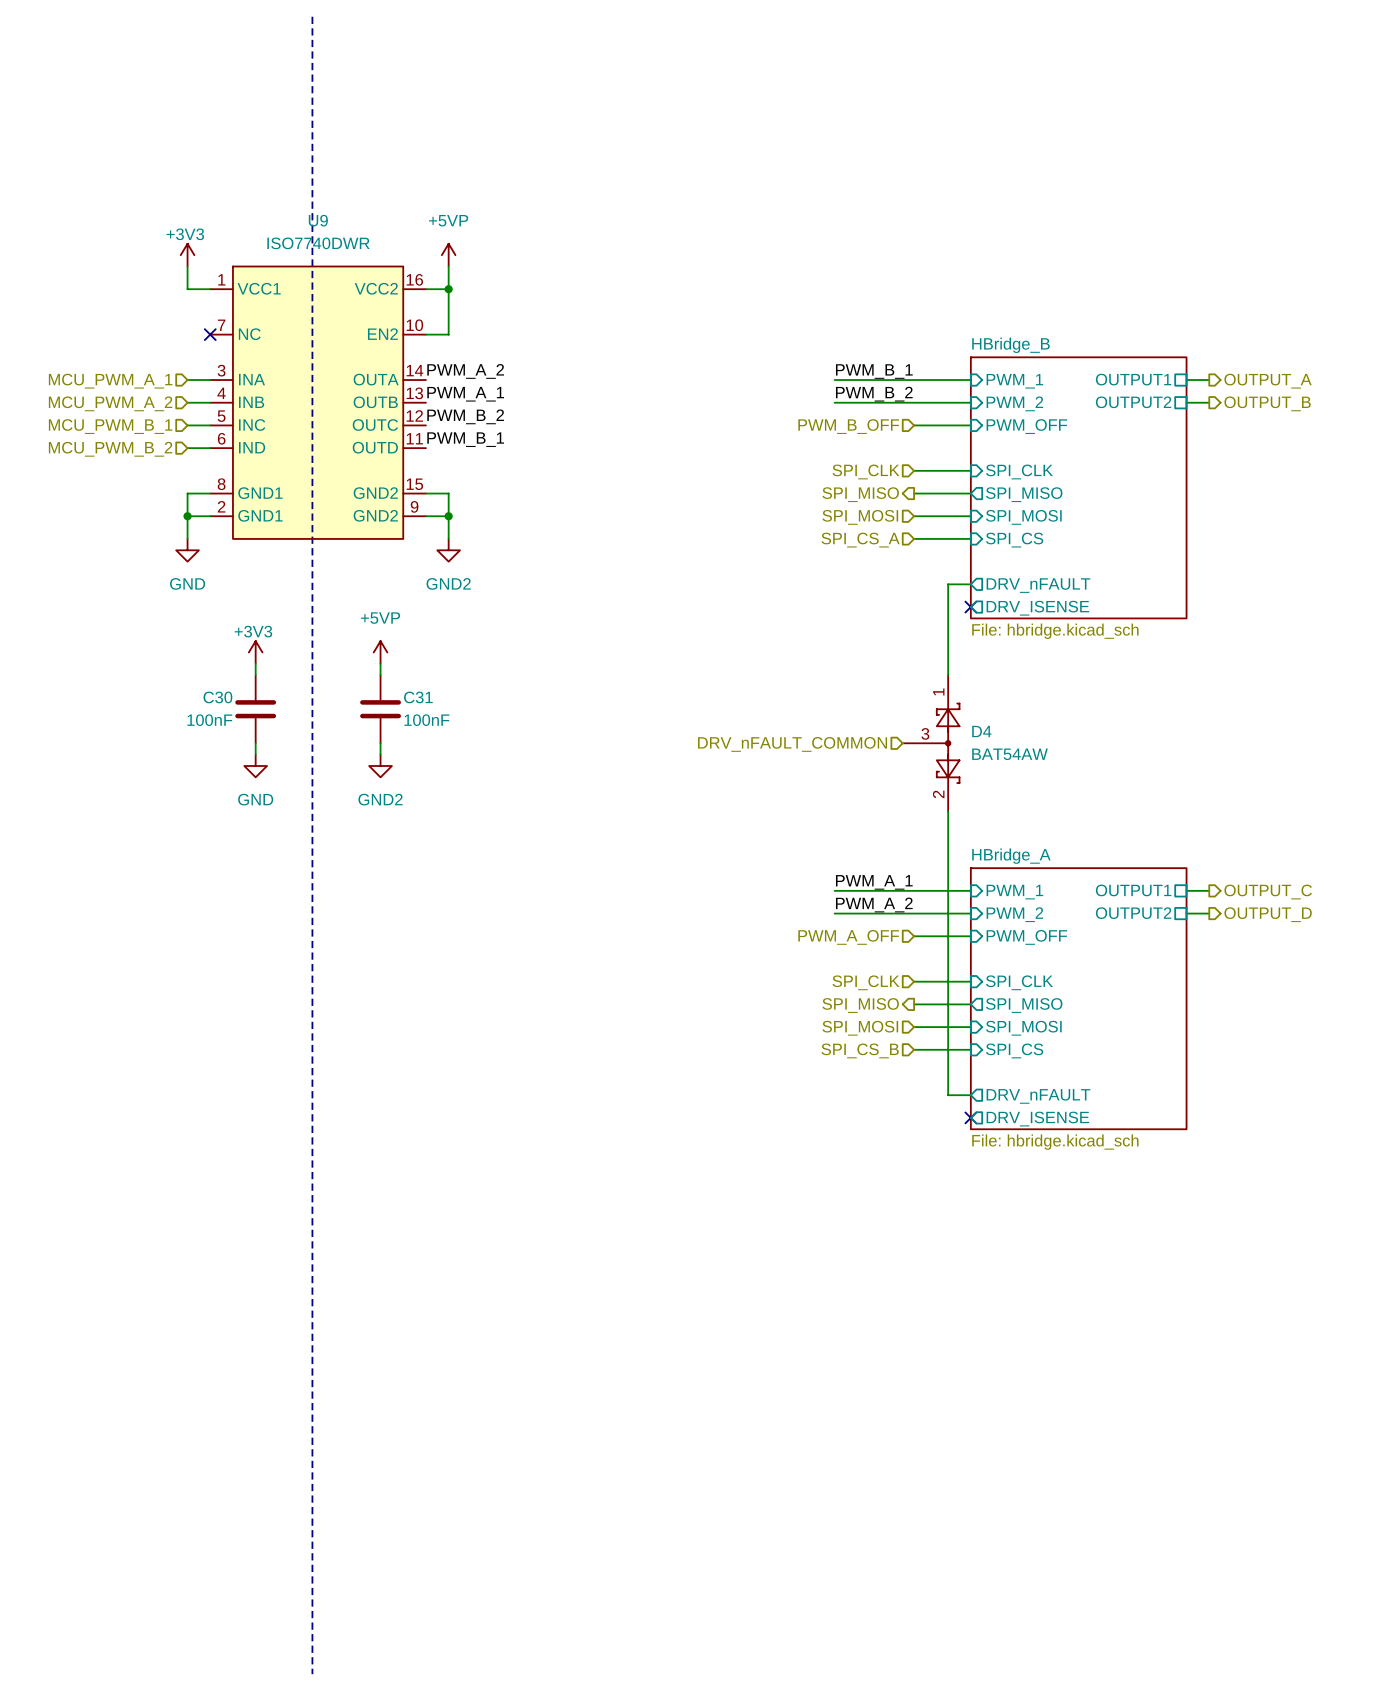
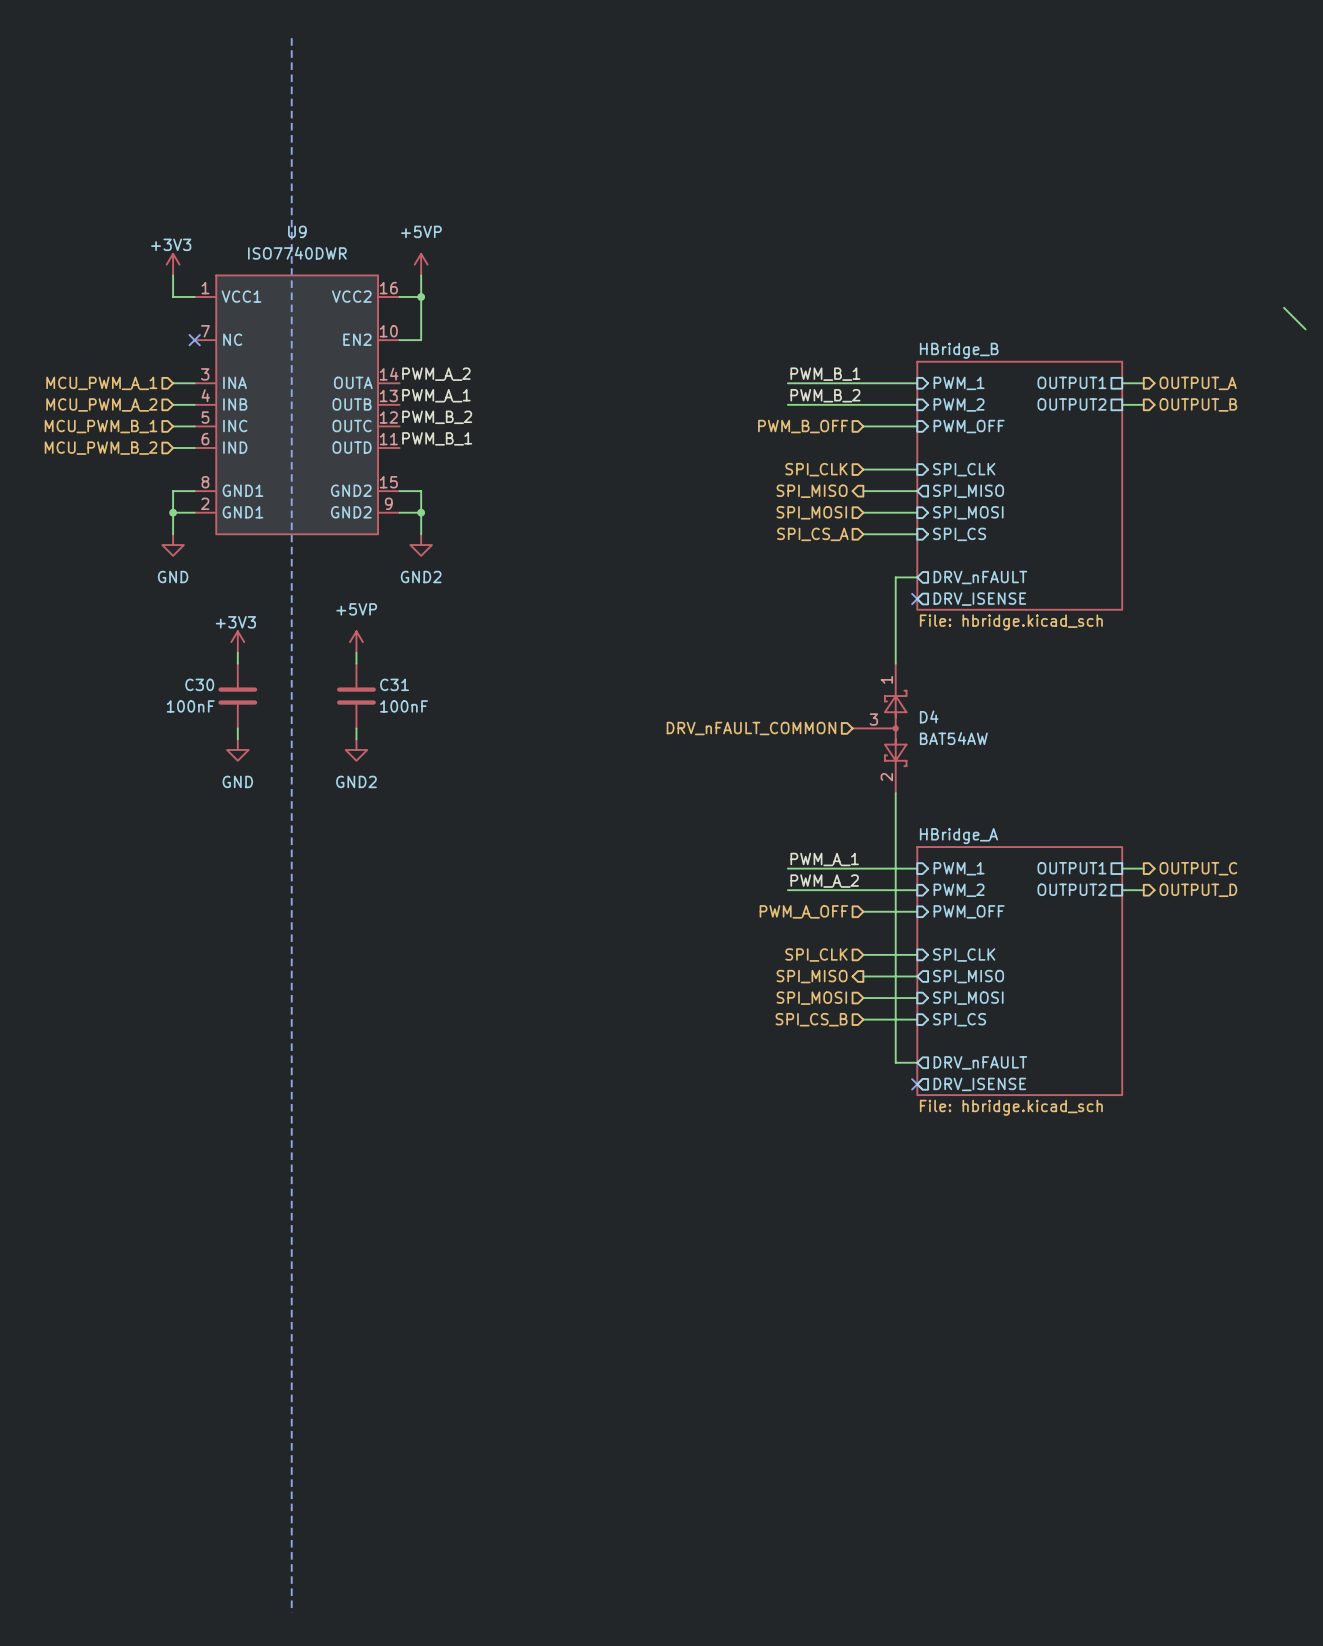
wire: none -> (1283, 307) (1305, 329)

